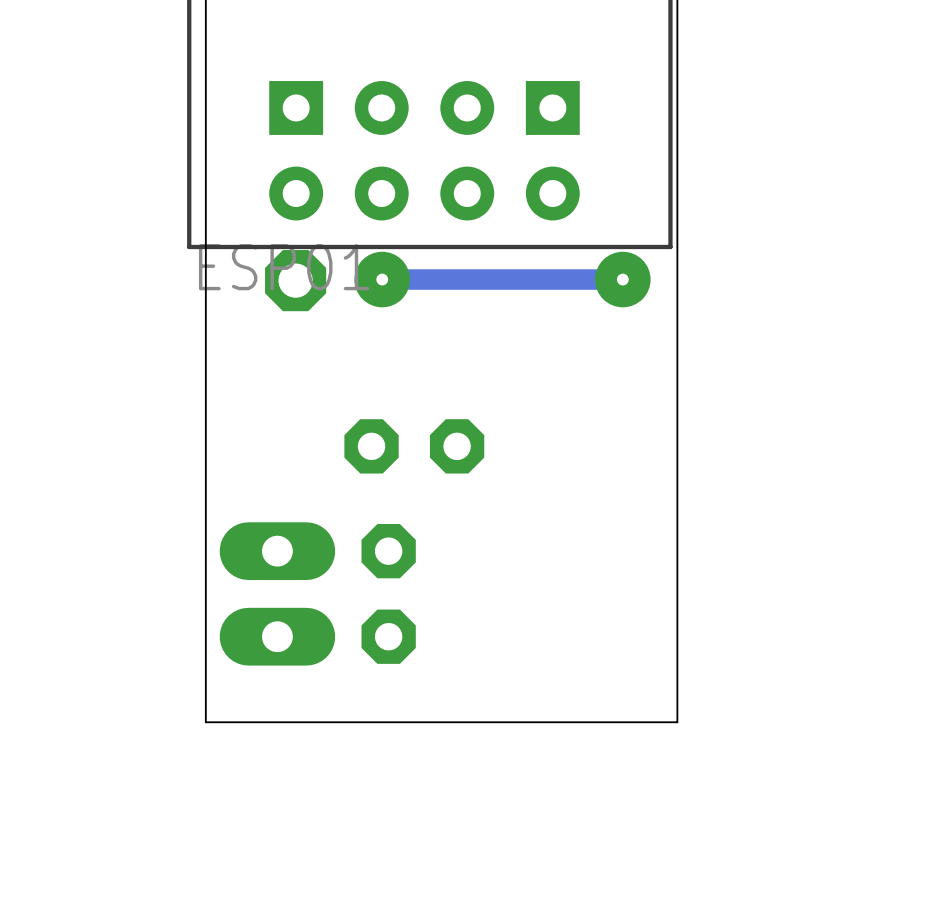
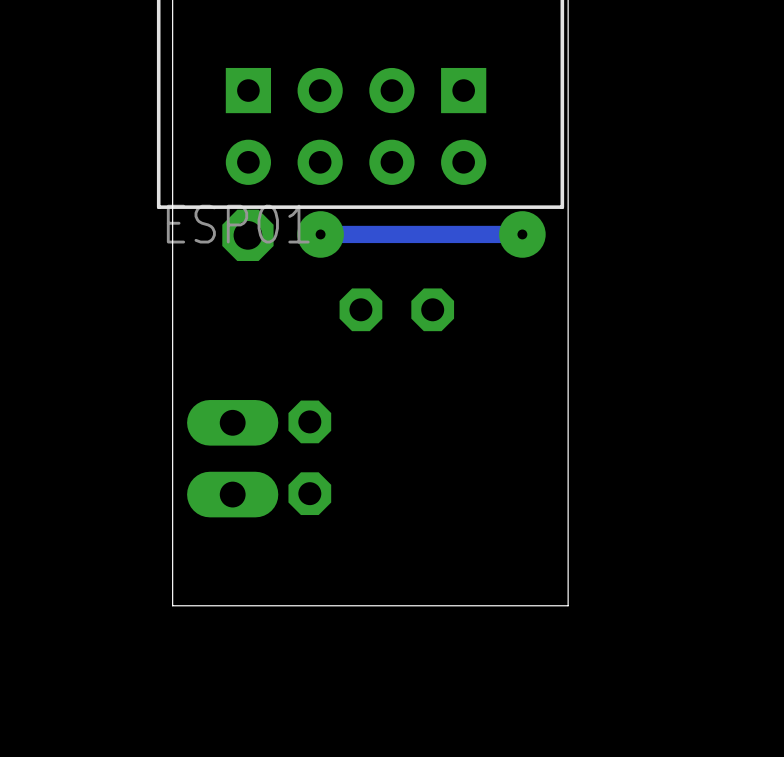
part: none -> (396, 309)
part: (414, 446) -> none
part: none -> (309, 457)
part: none -> (232, 458)
part: (277, 593) -> none
part: (388, 593) -> none

